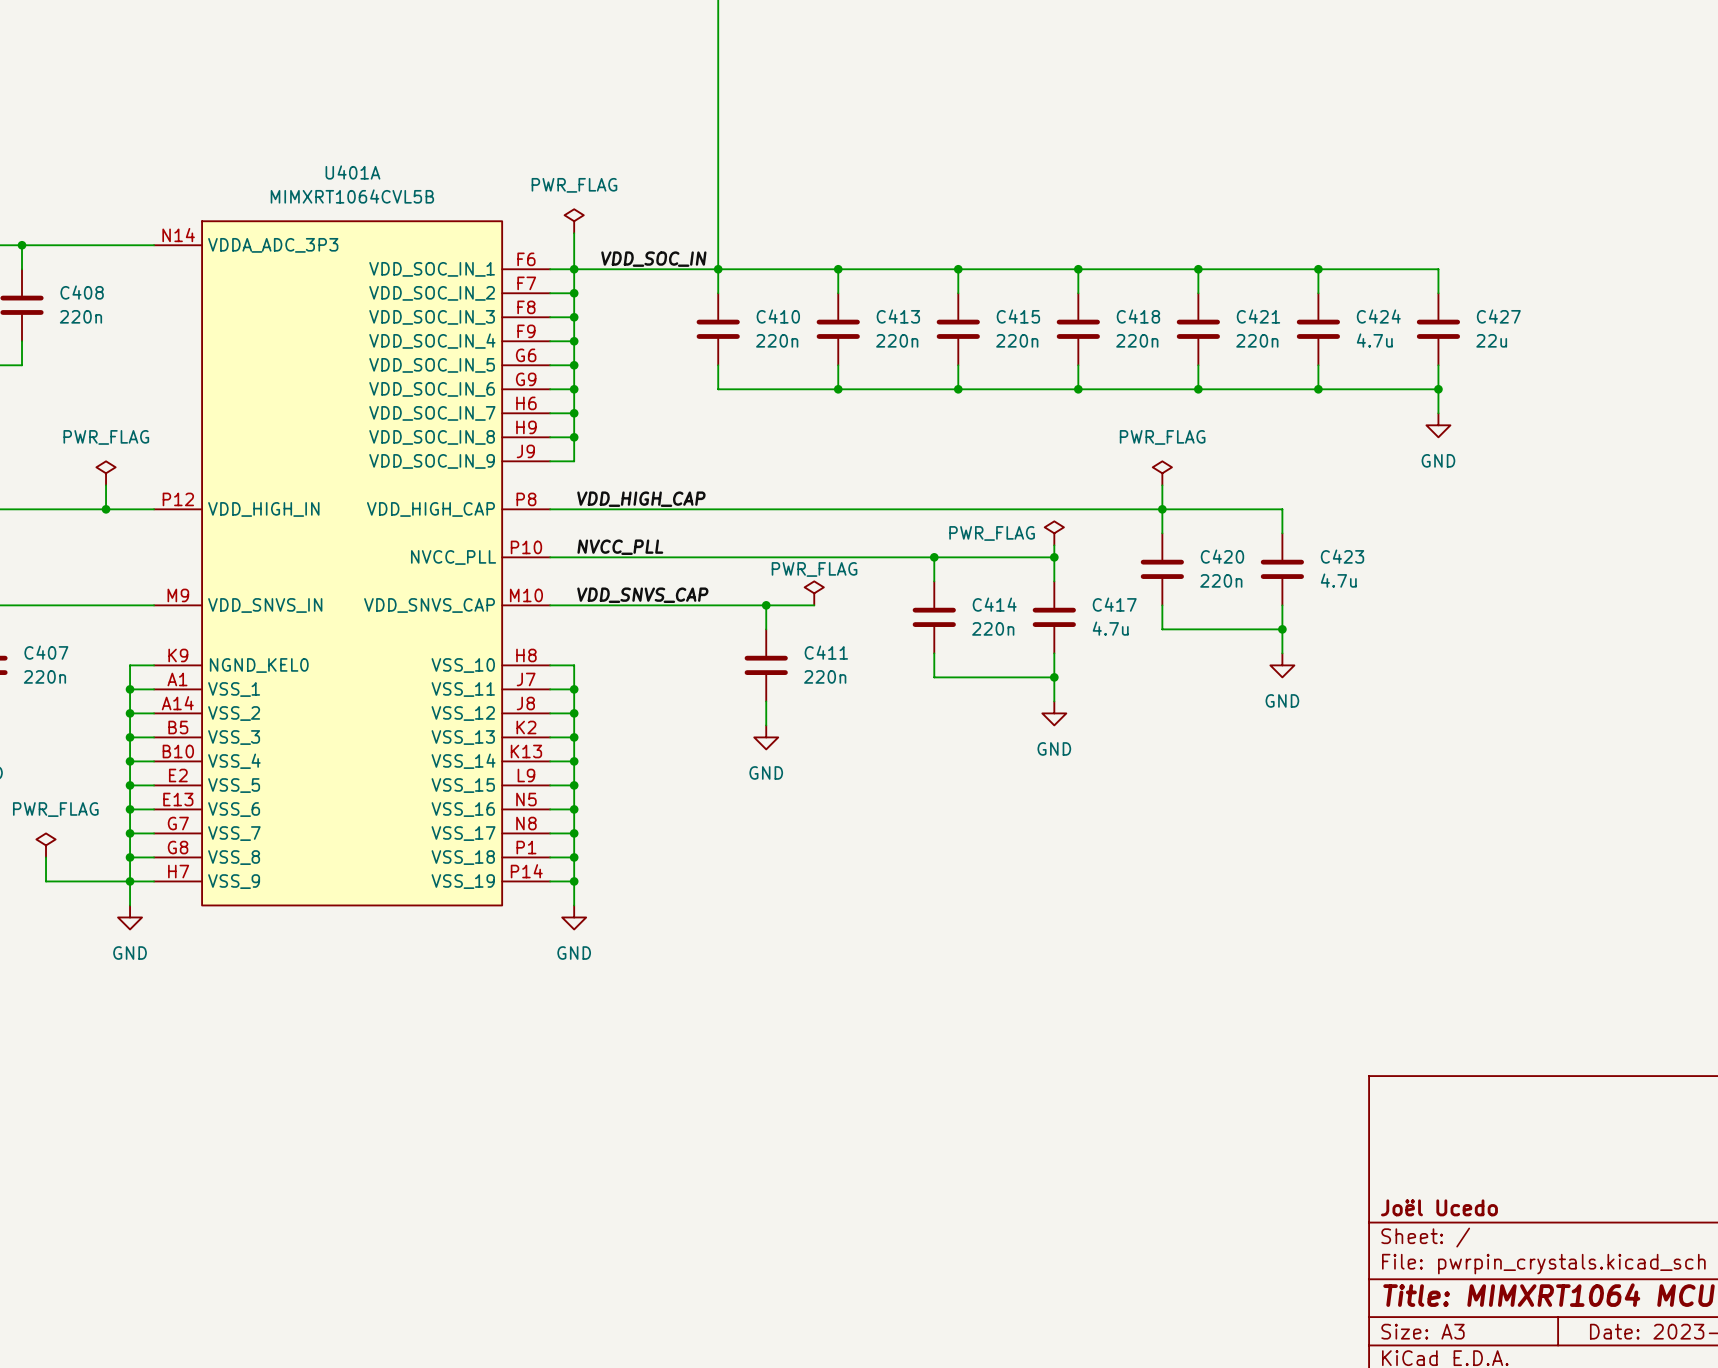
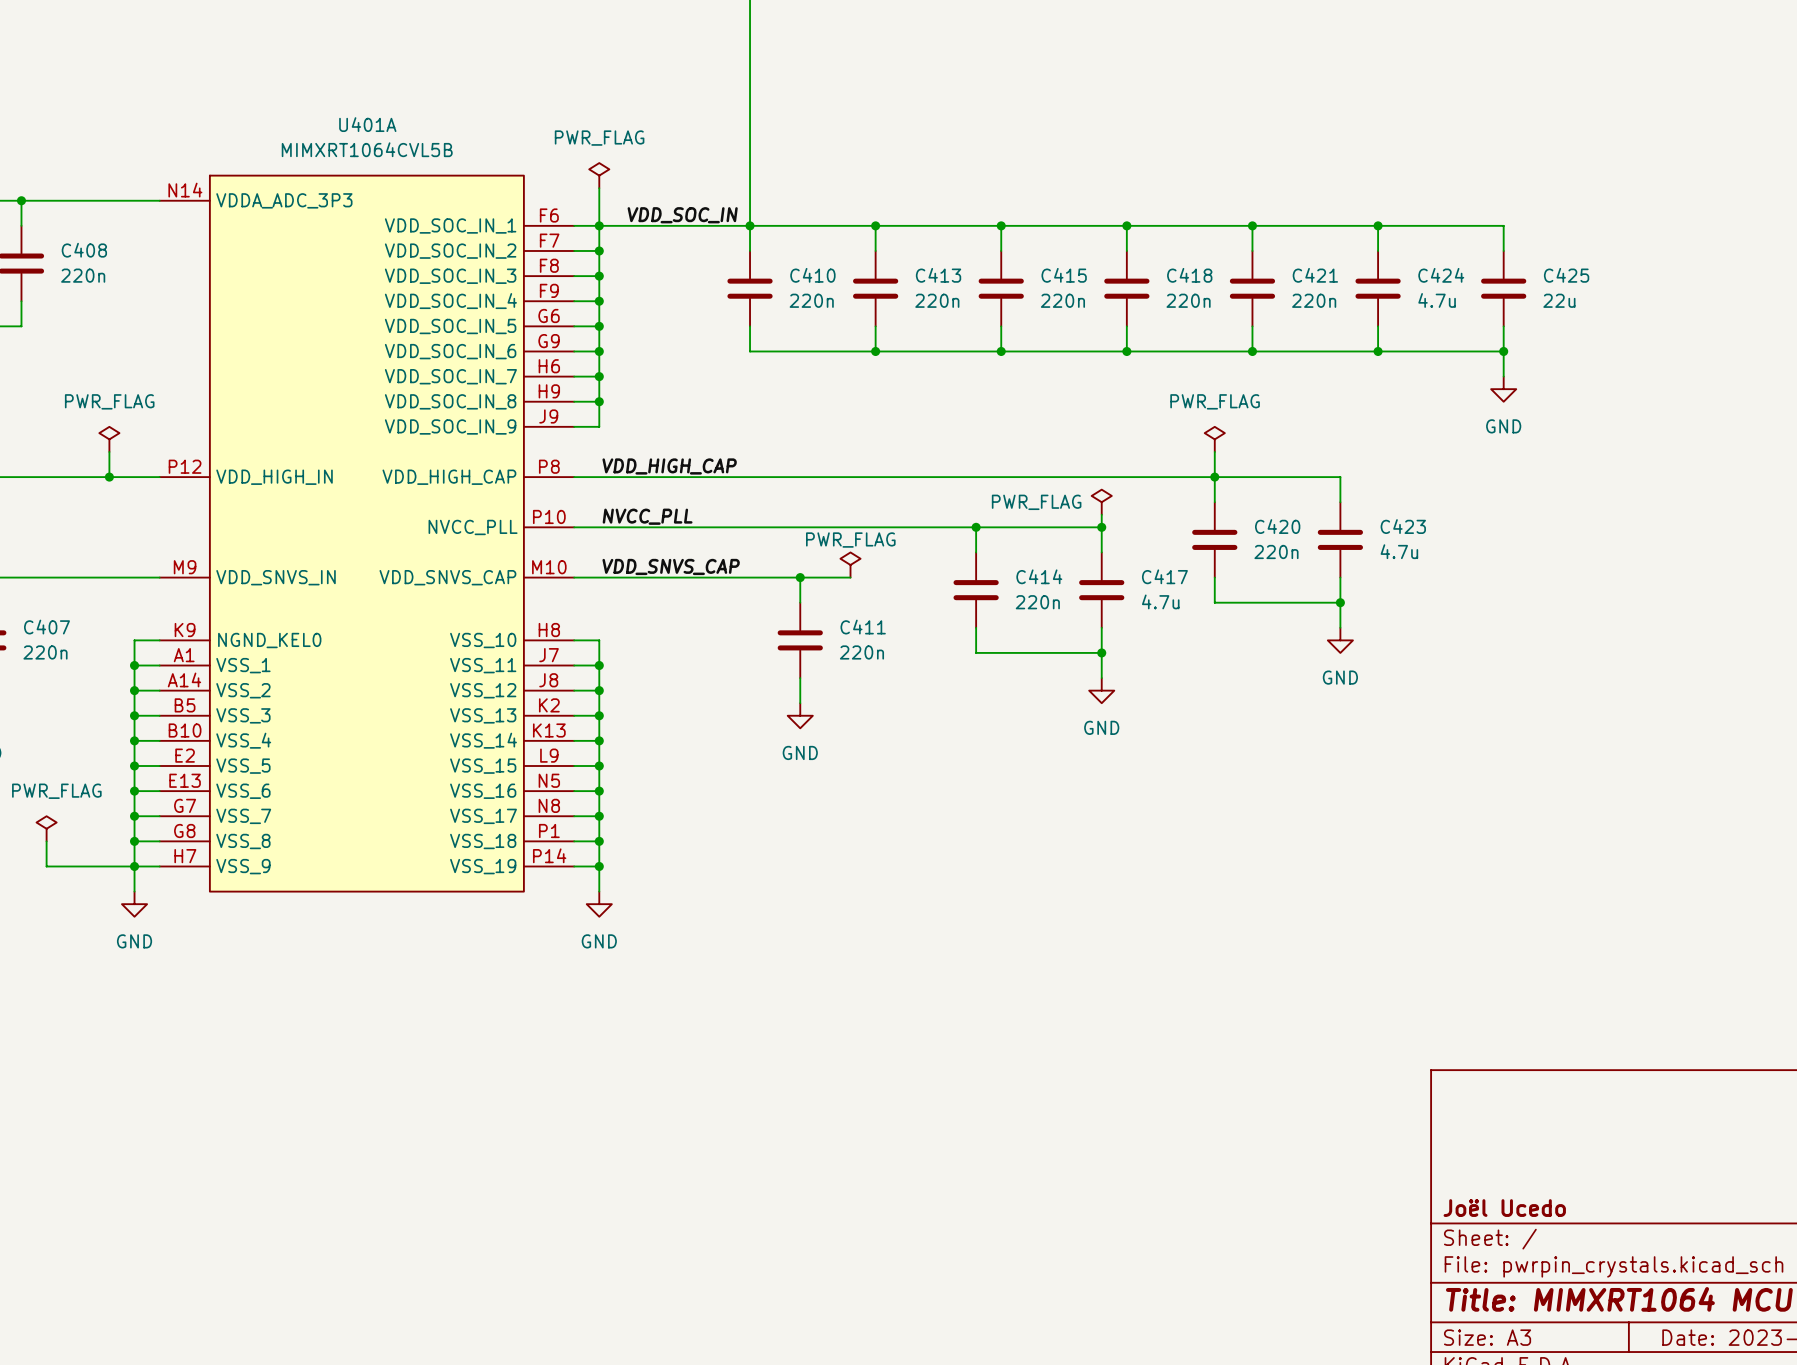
C427 name: C427 (1498, 316) -> C425 (1566, 275)

